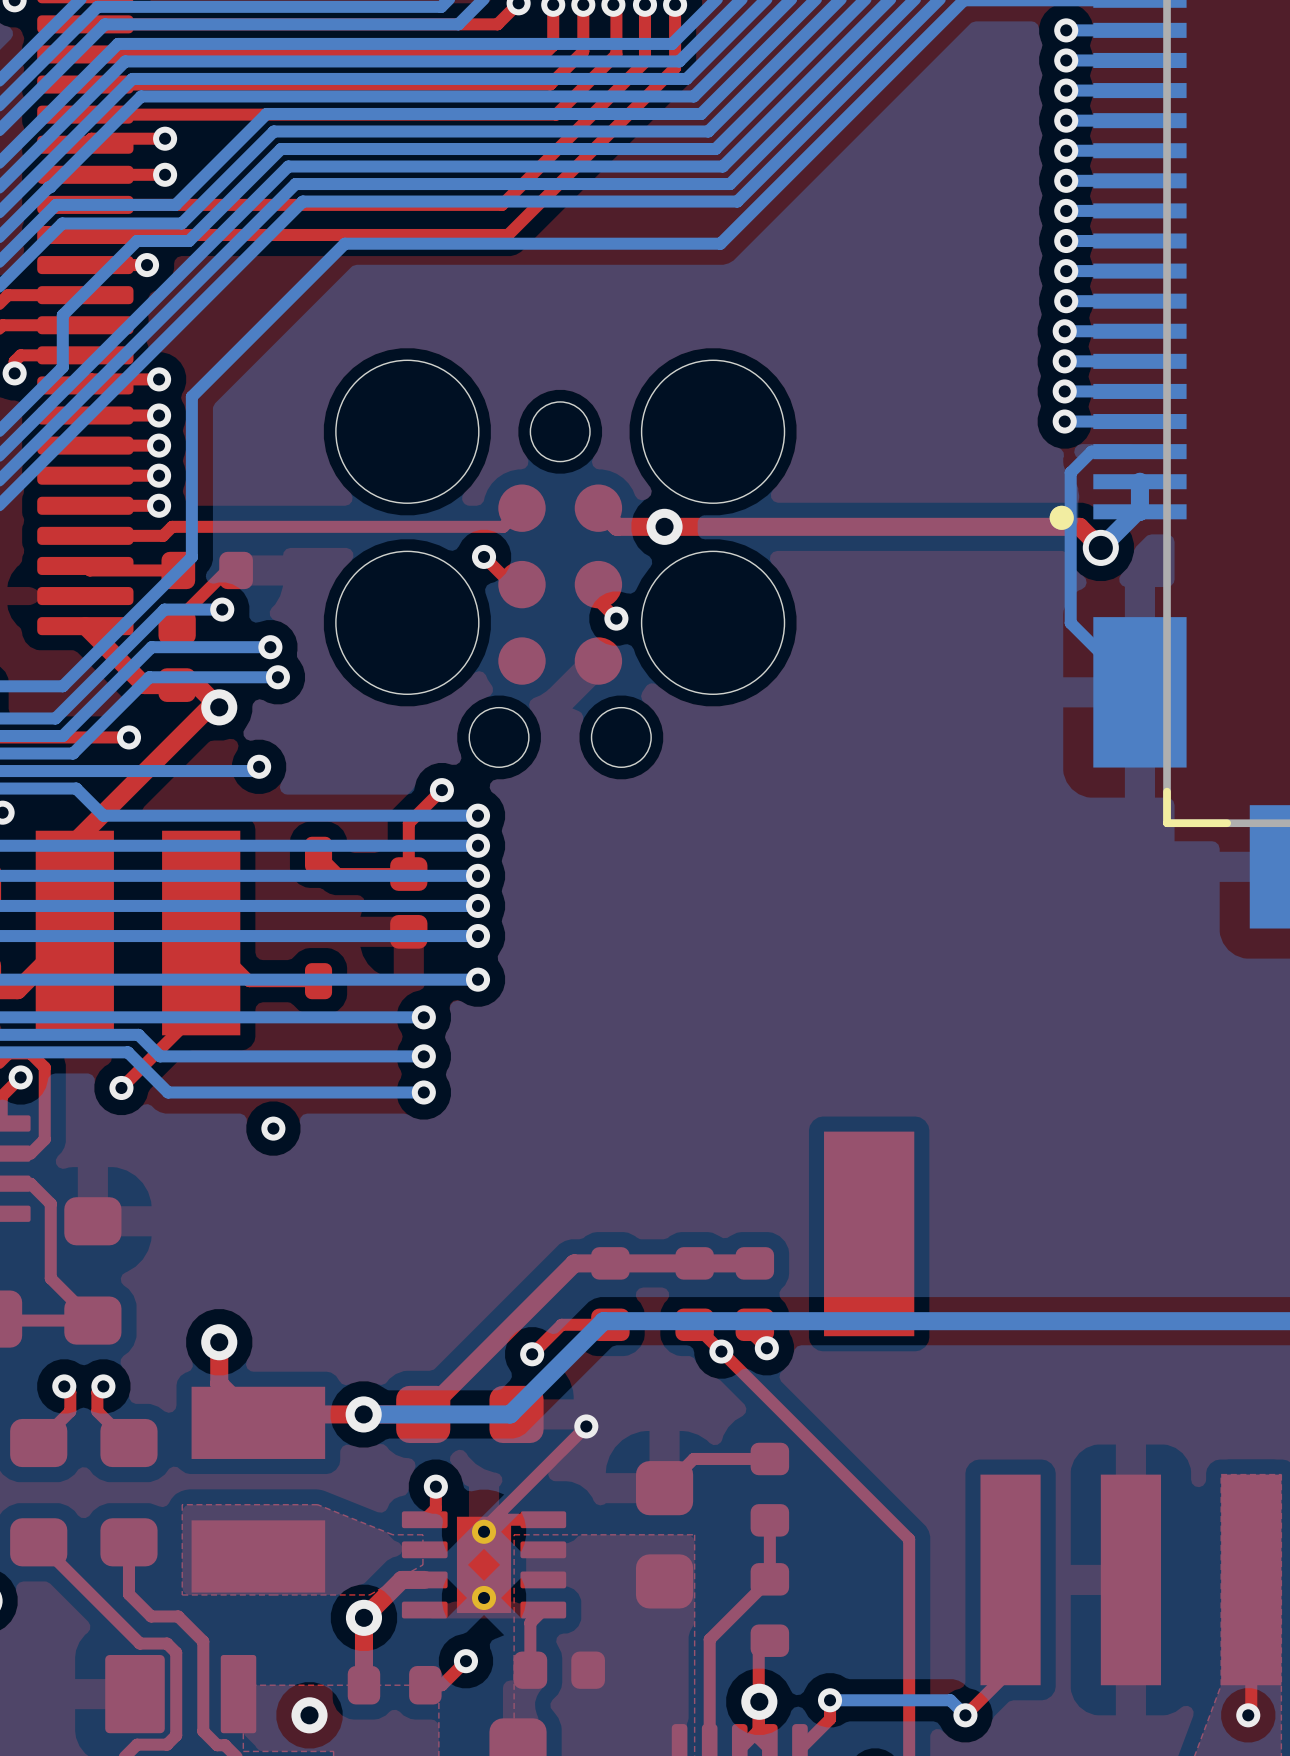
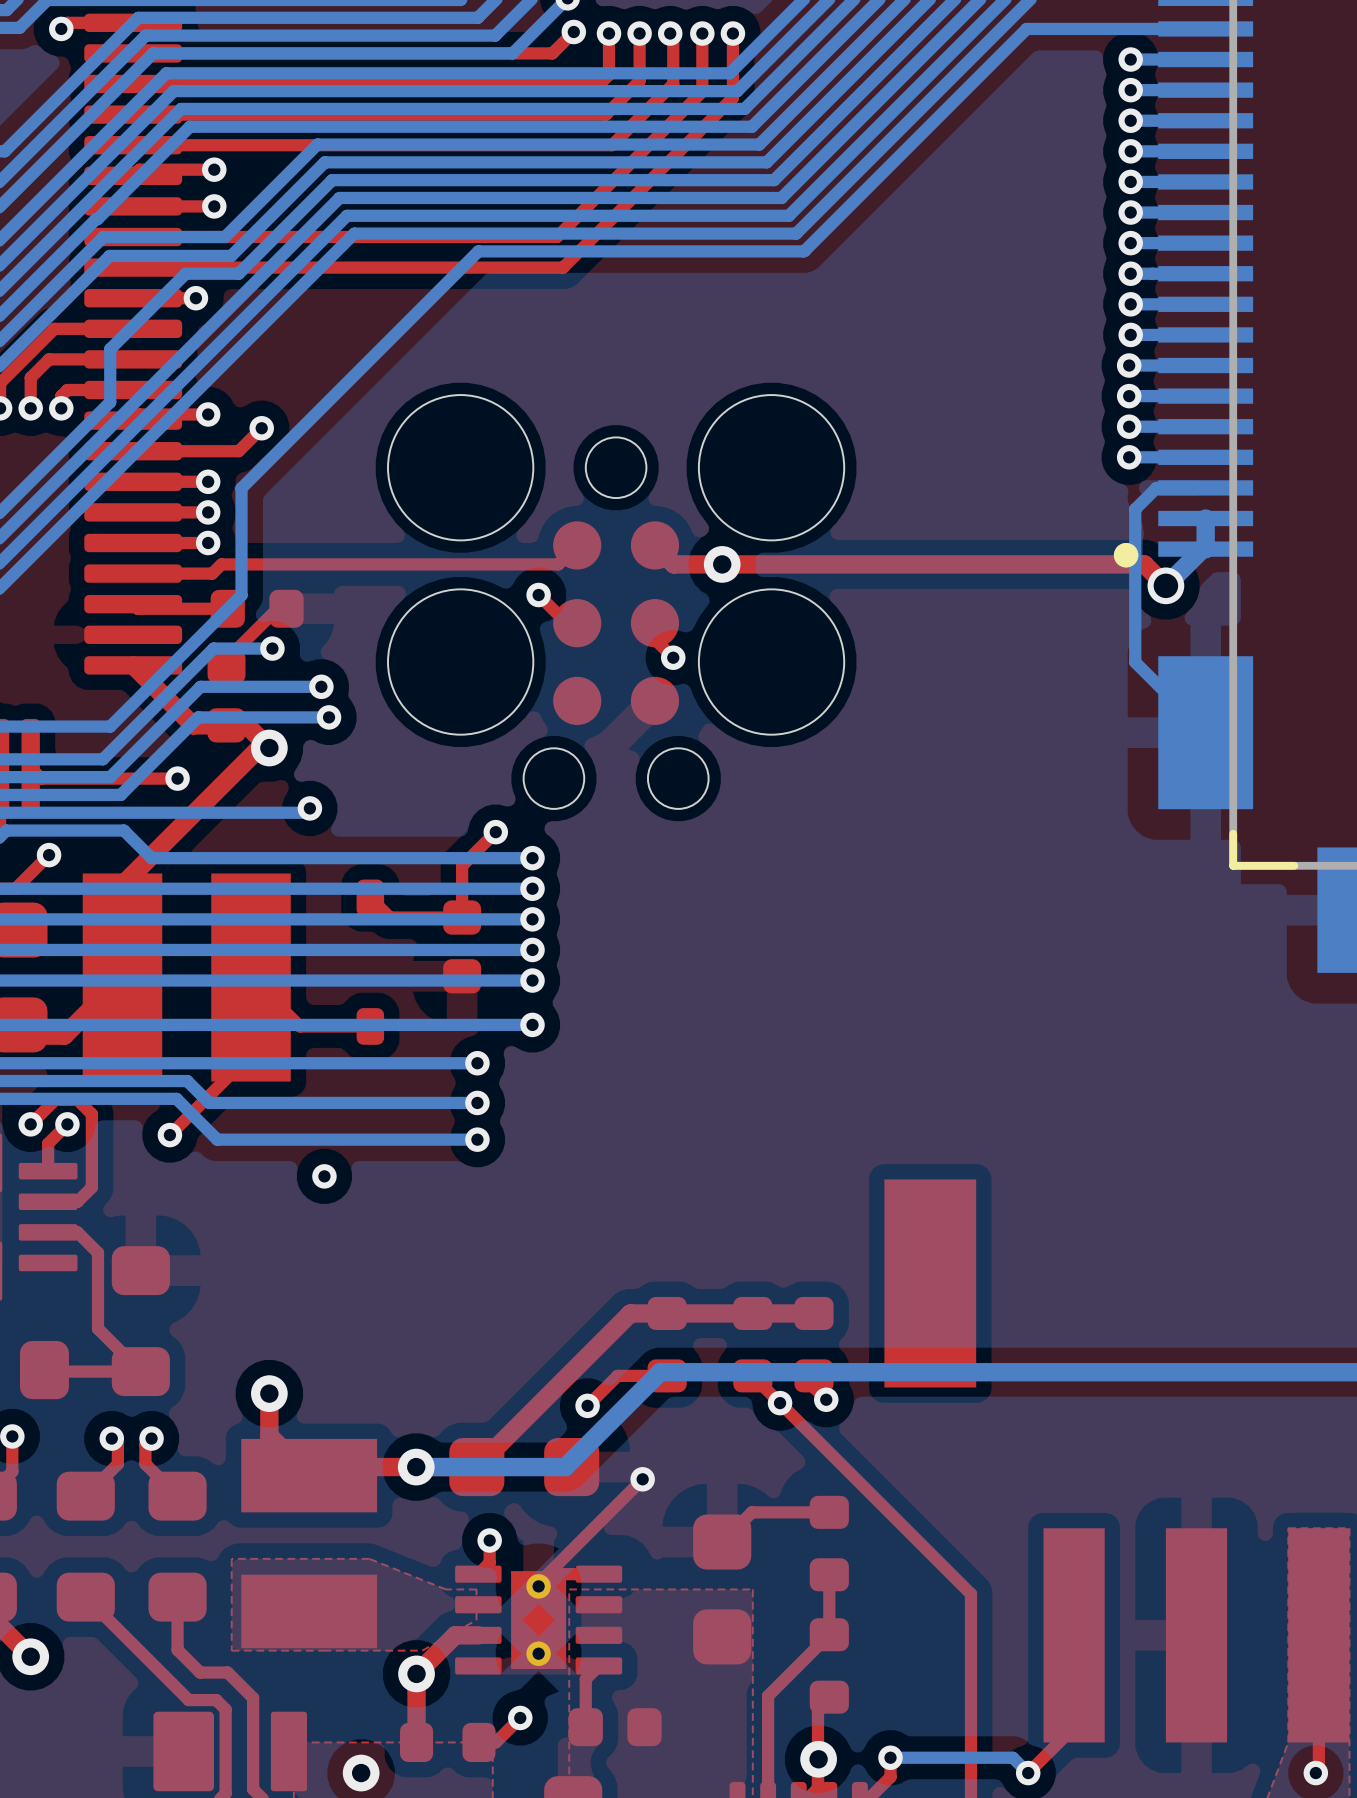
bottom track: (745, 218) (720, 243) (344, 243) (191, 396) (191, 451) -> (803, 251) (478, 251) (241, 488)
top track: none -> (261, 428) (238, 451) (208, 451)
via position: (159, 415) -> (261, 428)

